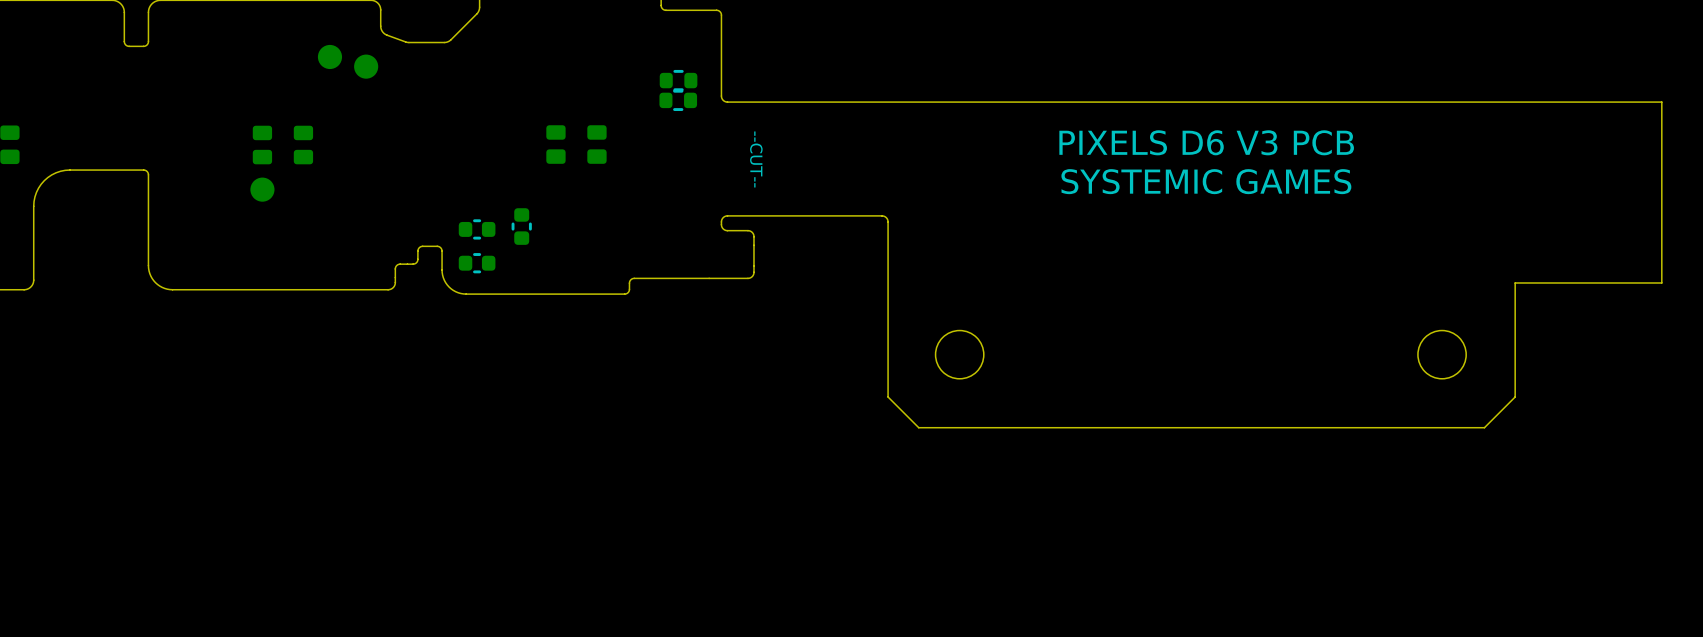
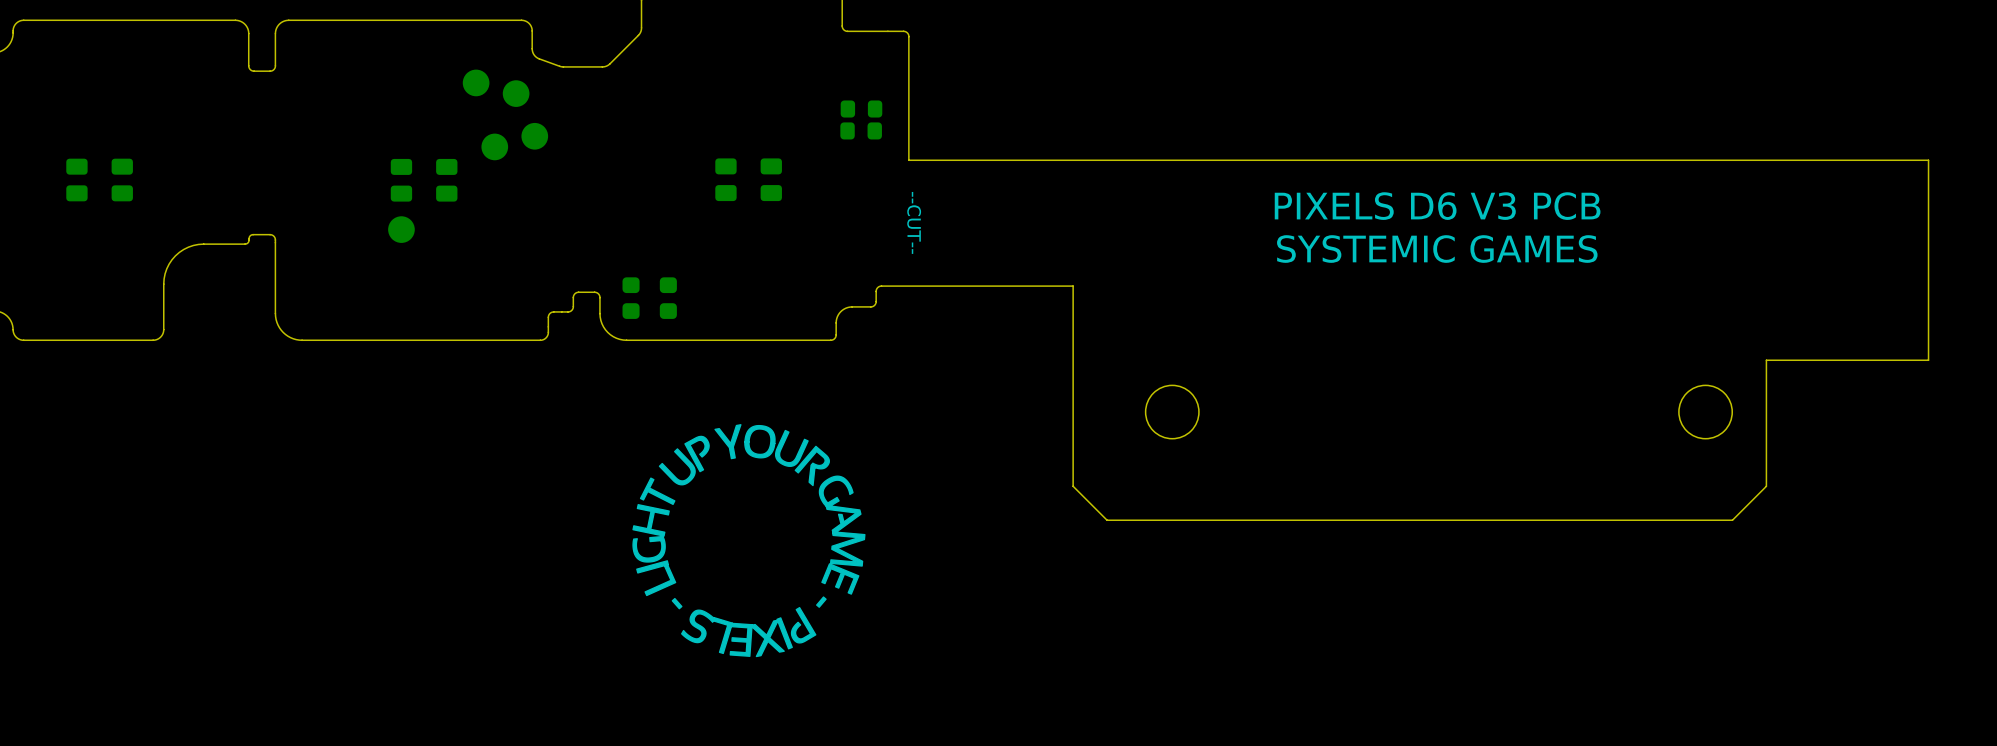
part footprint: [659, 69, 698, 92] -> [840, 100, 883, 118]
part footprint: [659, 89, 698, 112] -> [840, 122, 882, 140]
board edge: (721, 96) (723, 100) (727, 102) (1661, 102) (1661, 282) (1515, 282) (1515, 397) (1484, 427) (918, 427) (888, 397) (888, 221) (884, 216) (725, 216) (721, 221) (724, 229) (748, 230) (753, 234) (753, 272) (751, 277) (633, 278) (629, 281) (628, 291) (625, 294) (460, 293) (451, 288) (444, 280) (442, 272) (441, 249) (437, 246) -> (908, 126) (908, 160) (1928, 160) (1928, 360) (1766, 360) (1766, 486) (1732, 520) (1107, 520) (1073, 486) (1073, 286) (880, 286) (876, 289) (876, 302) (873, 306) (850, 307) (840, 311) (836, 318) (835, 336) (830, 340) (619, 339) (610, 334) (603, 326) (600, 317) (599, 296) (594, 292)
part: none -> (534, 136)
part: none -> (494, 146)
text position: PIXELS D6 V3 PCB (1206, 142) -> PIXELS D6 V3 PCB (1437, 206)
text position: --CUT-- (756, 159) -> --CUT-- (914, 222)
text position: SYSTEMIC GAMES (1206, 181) -> SYSTEMIC GAMES (1437, 249)
board edge: (148, 199) (148, 174) (144, 170) (65, 170) (47, 177) (41, 184) (34, 196) (33, 281) (30, 287) (24, 289) -> (275, 239) (271, 234) (252, 234) (246, 243) (198, 244) (179, 252) (172, 259) (165, 273) (162, 334) (155, 339) (137, 340)
part: (521, 226) -> none
part: (477, 229) -> none
part: none -> (631, 298)
part: none -> (668, 298)
part: (477, 263) -> none
drawing: none -> [632, 424, 866, 658]

